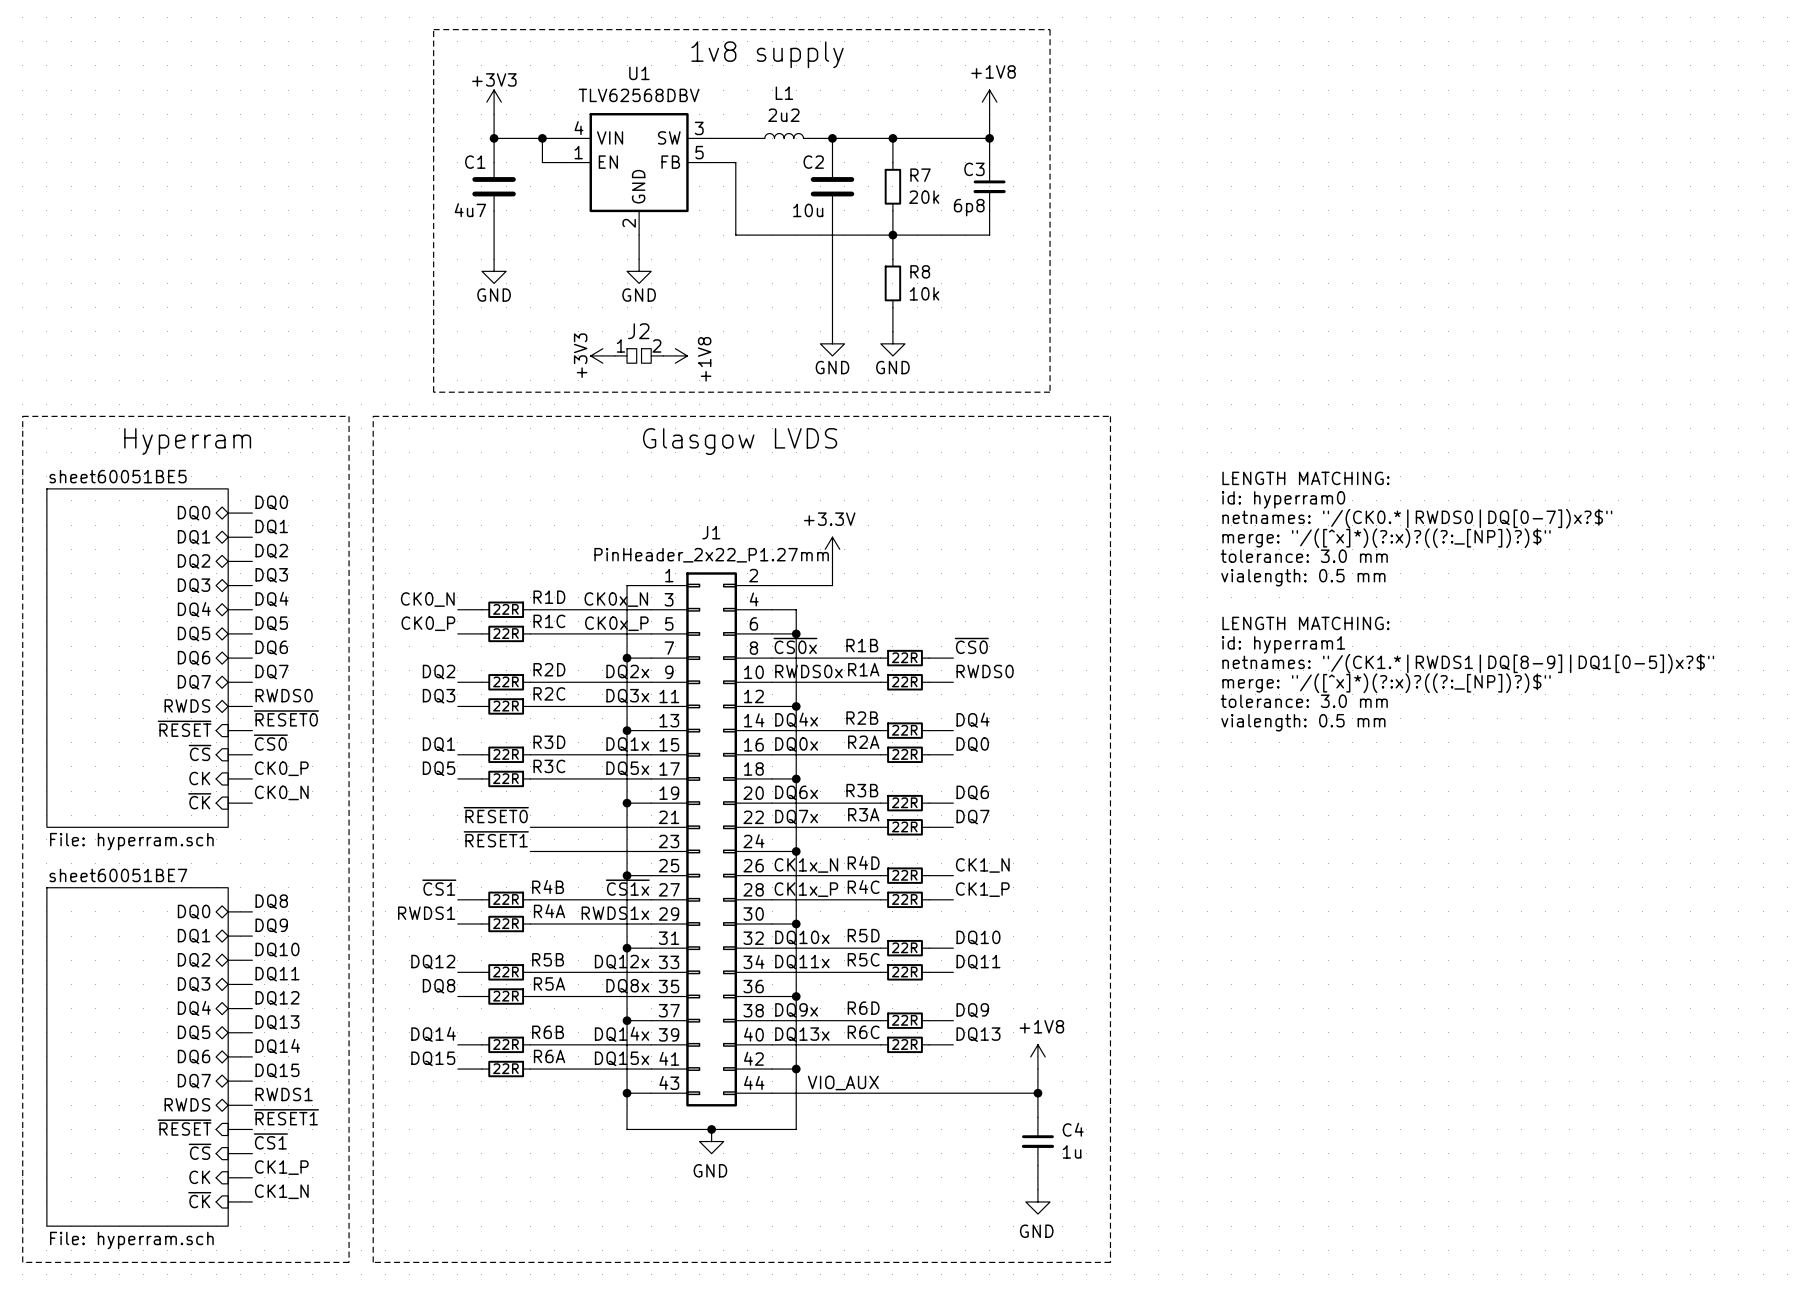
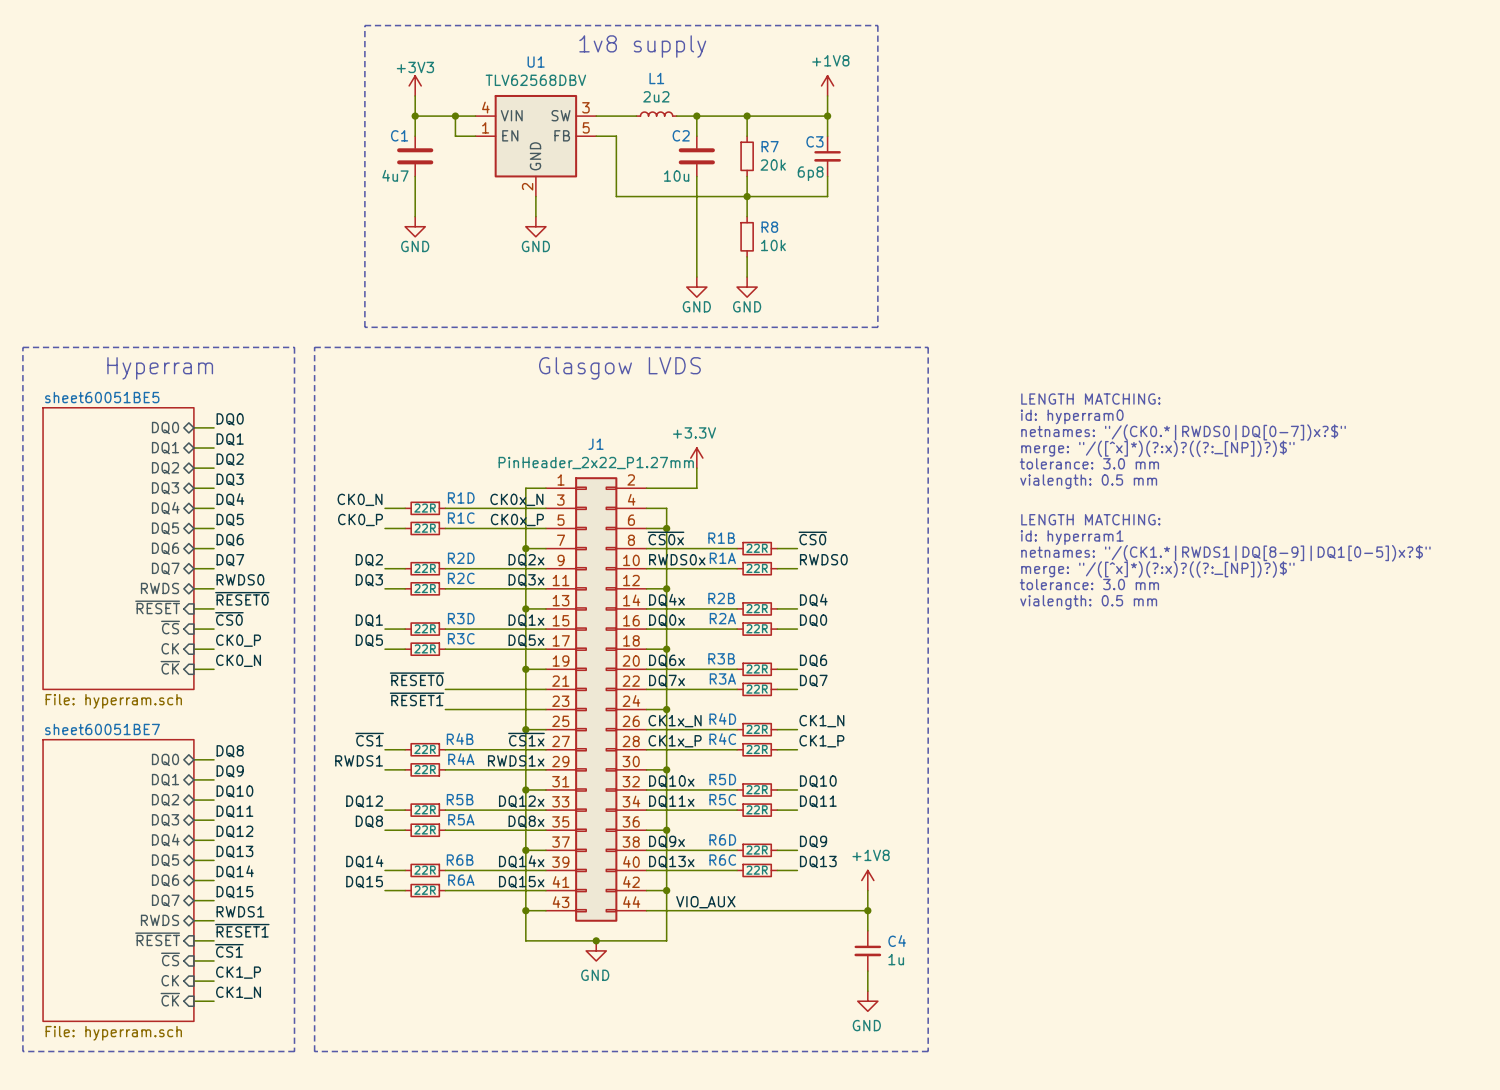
power symbol: +3V3 (602, 355) -> none
J2: (639, 355) -> none
power symbol: +1V8 (675, 355) -> none

